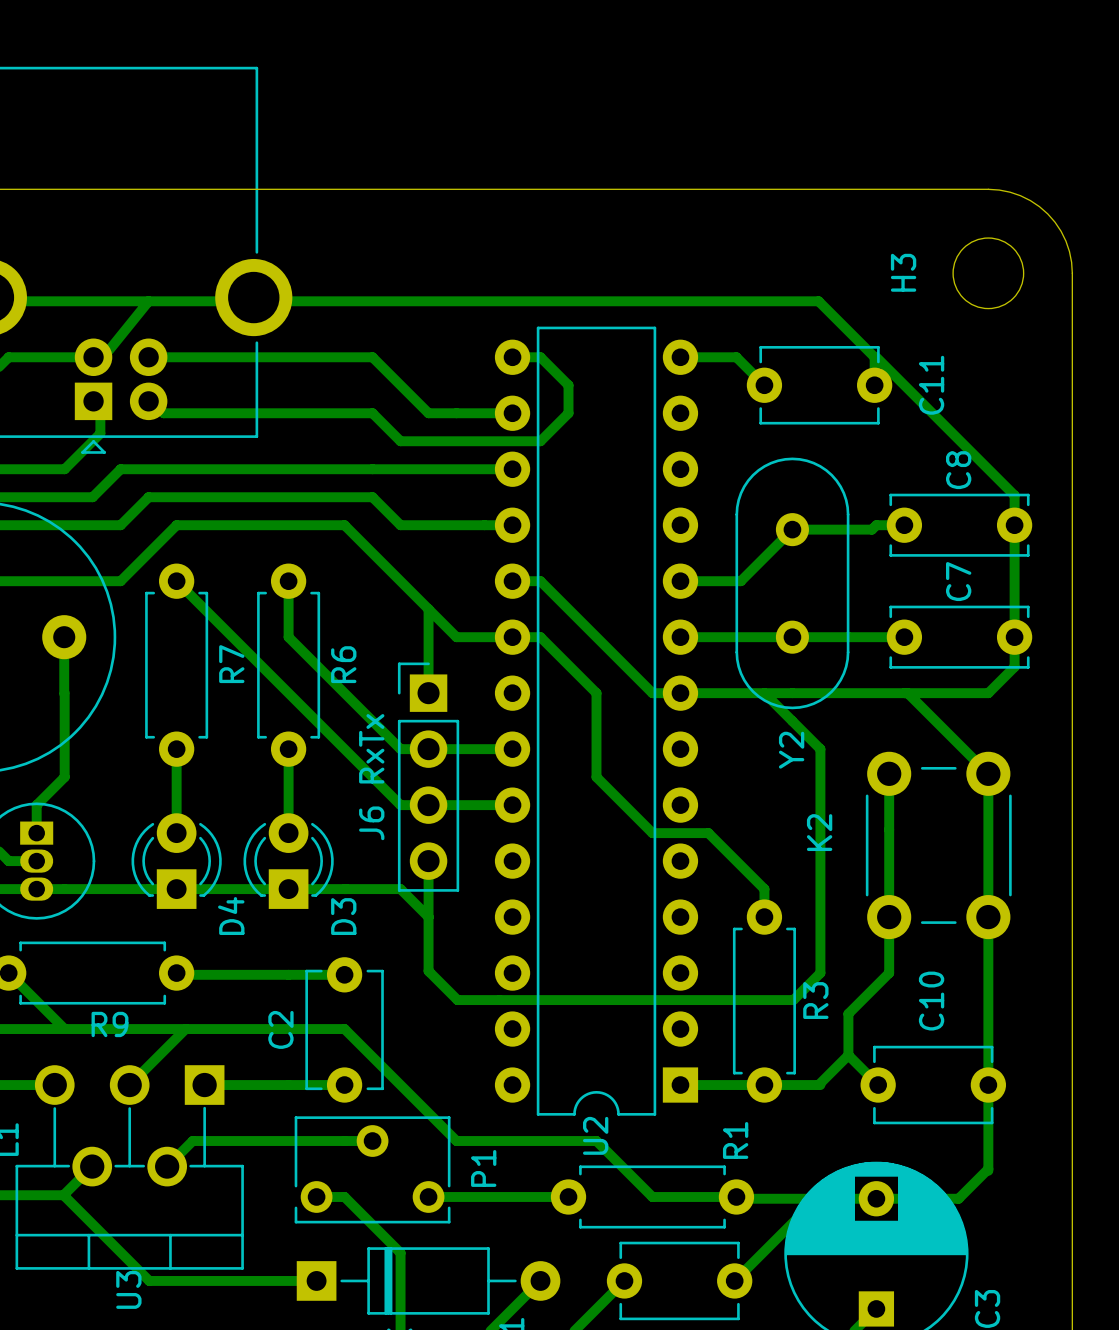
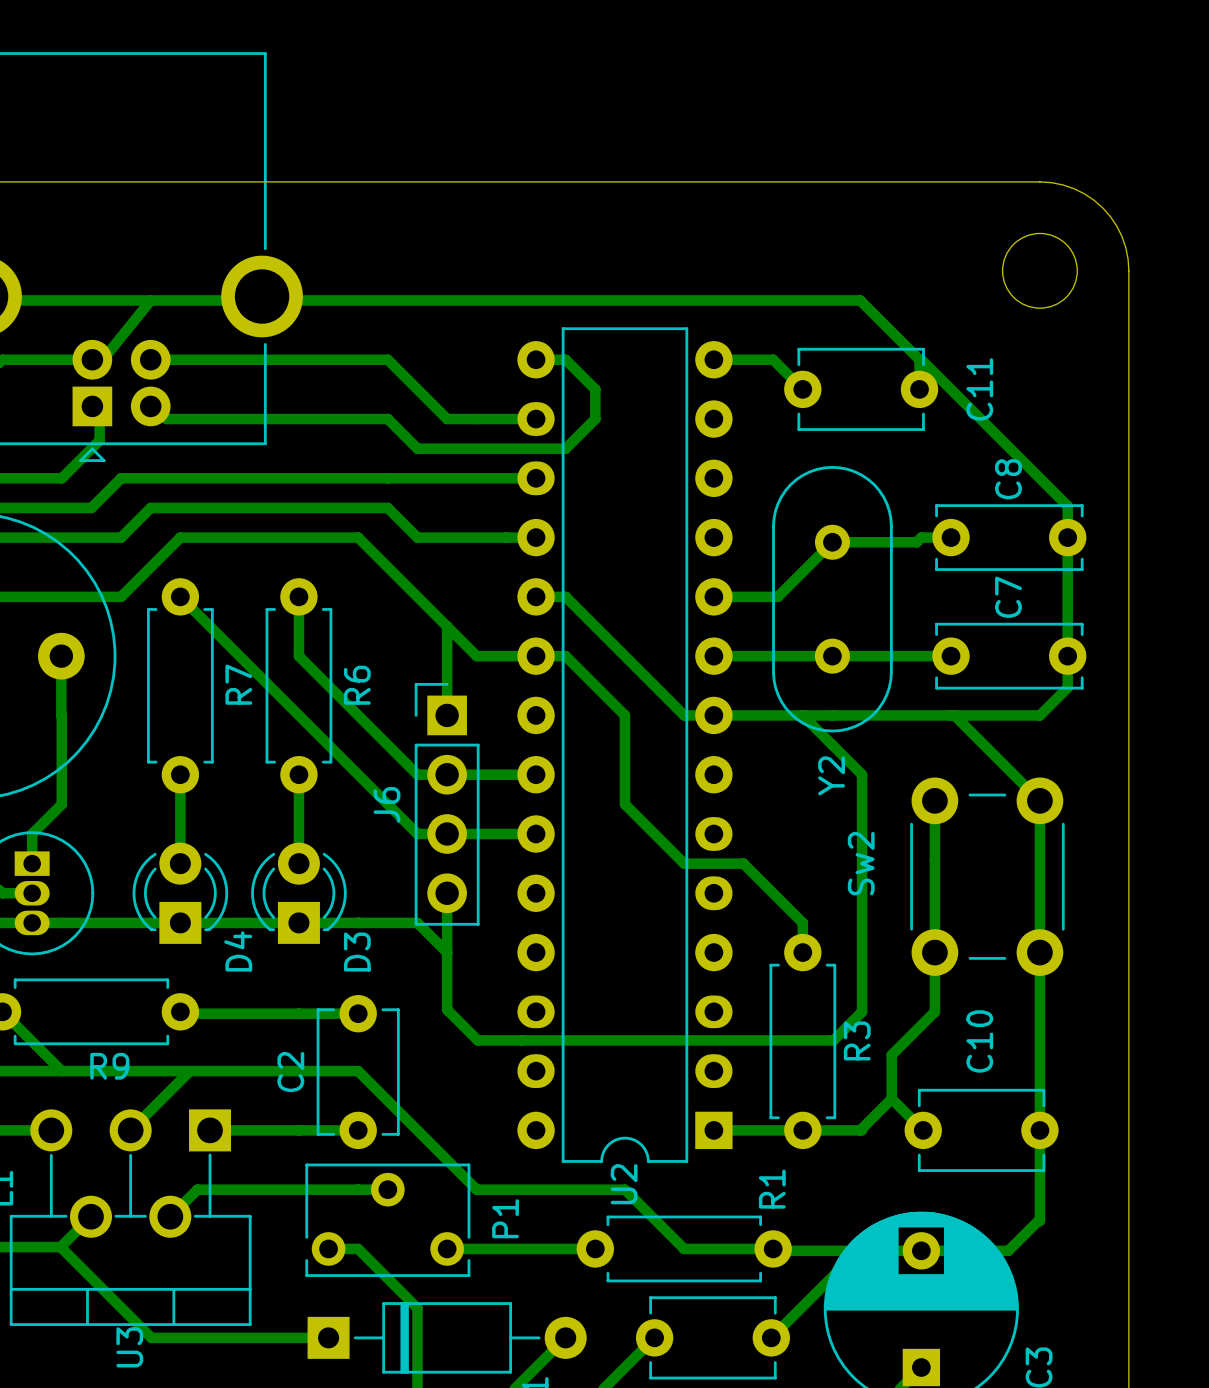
H3 name: H3 (903, 272) -> none
U2 footprint: [494, 326, 699, 1116] -> [517, 327, 733, 1163]
J6 RxTx name: J6 RxTx (371, 777) -> J6 (386, 804)
K2 name: K2 (819, 832) -> Sw2 (861, 863)

